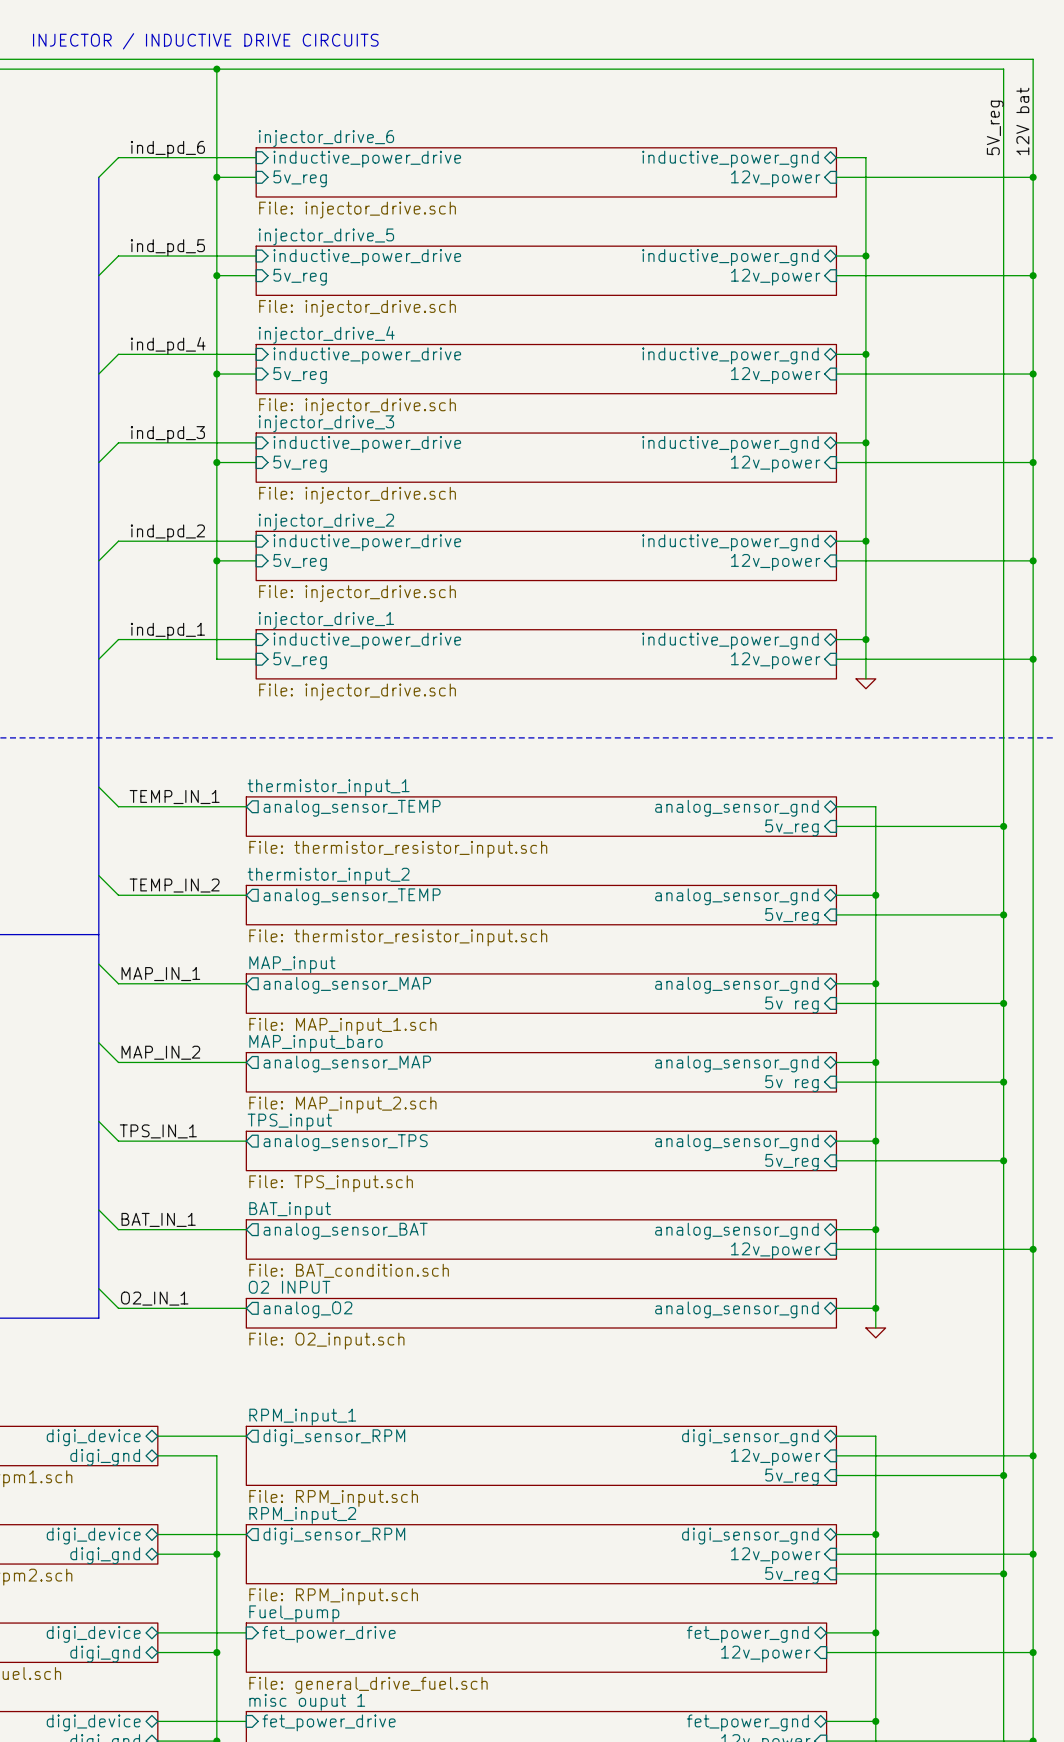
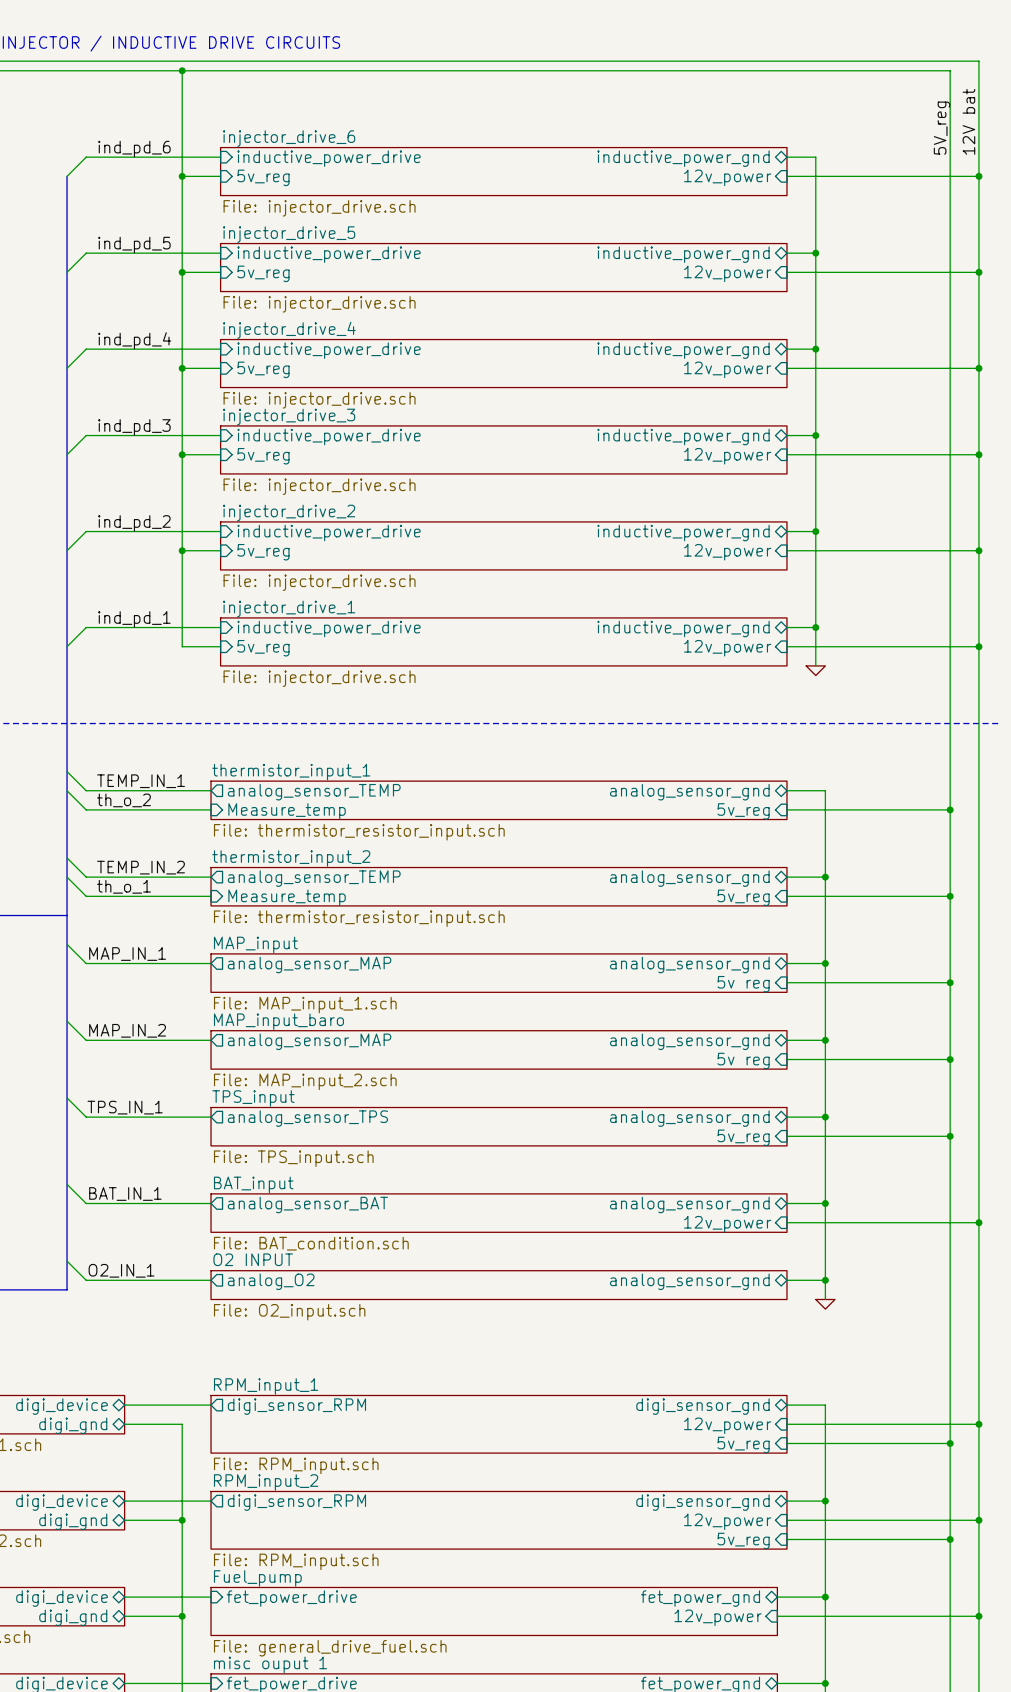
wire: none -> (67, 790) (86, 809) (211, 809)
label: none -> th_o_2 (124, 800)
sheet pin: none -> Measure_temp (287, 811)
wire: none -> (67, 877) (86, 896) (211, 896)
label: none -> th_o_1 (124, 886)
sheet pin: none -> Measure_temp (287, 897)

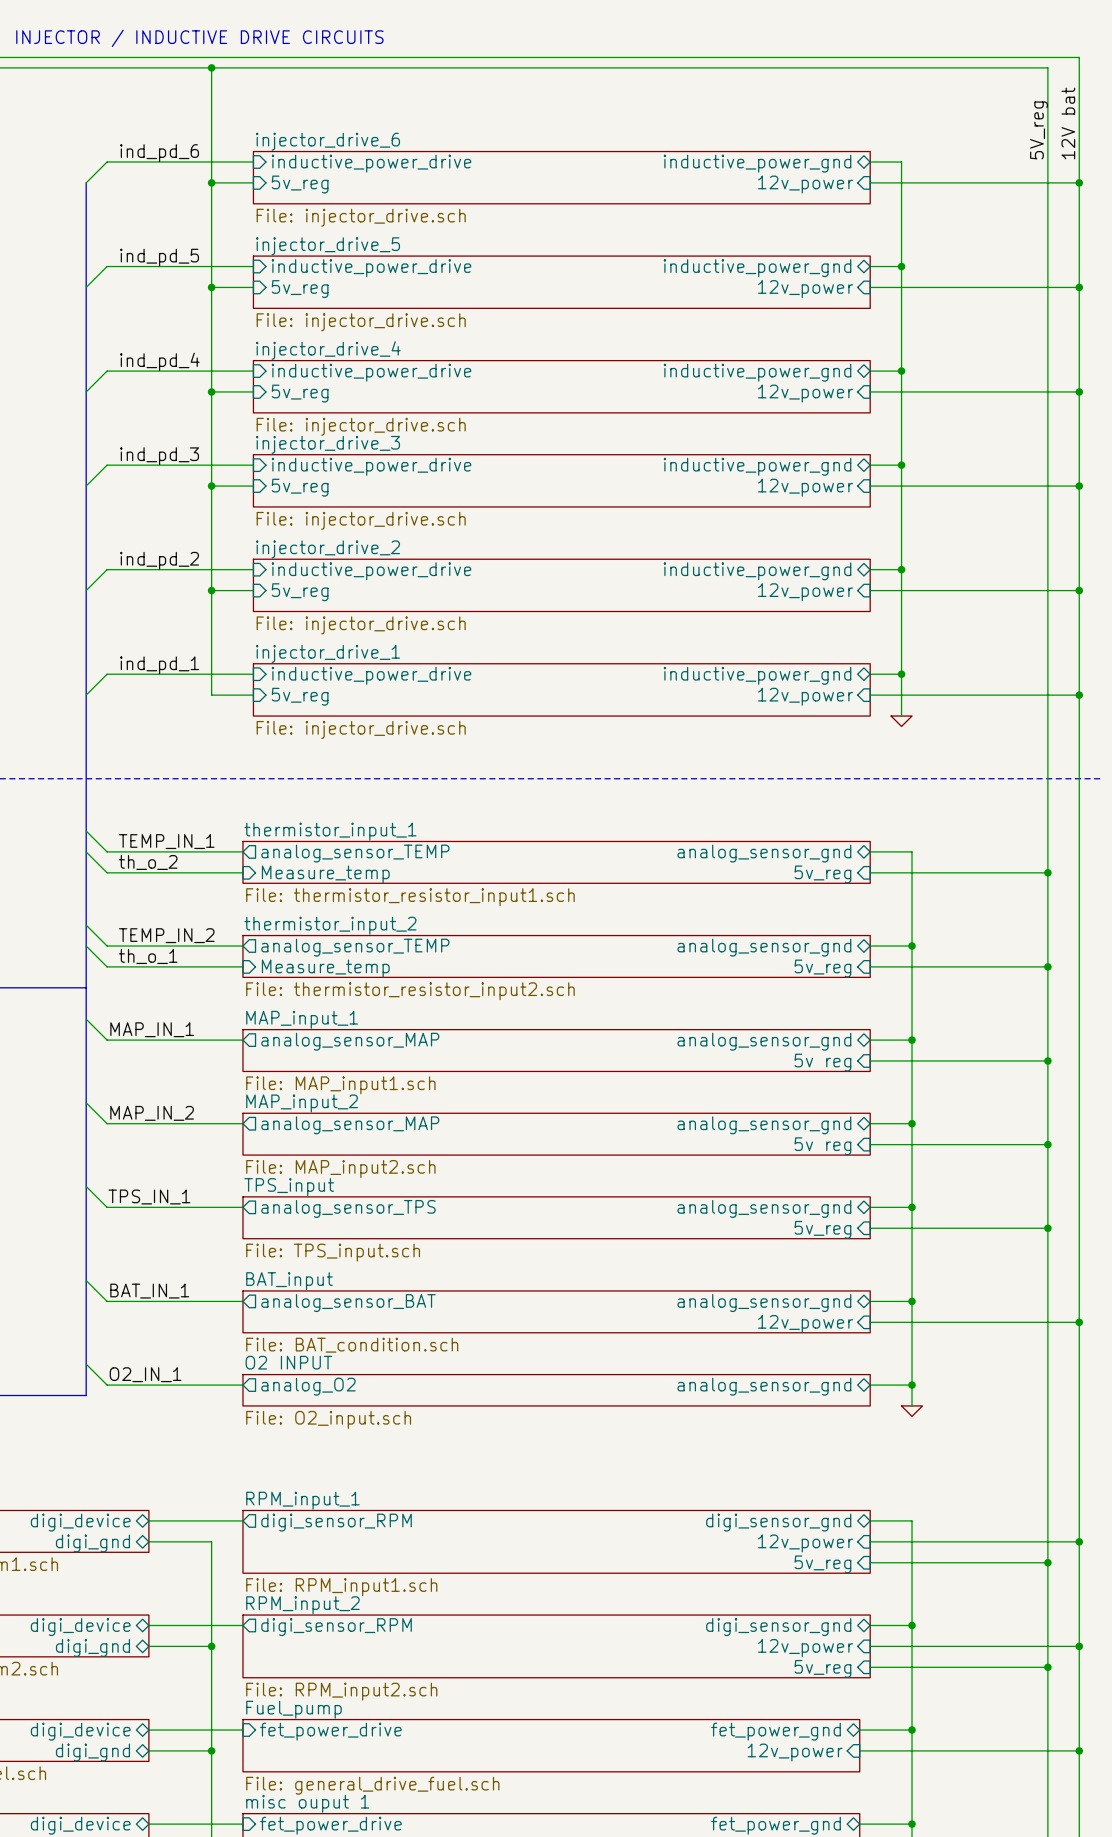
sheet thermistor_input_1 value: File: thermistor_resistor_input.sch (359, 832) -> File: thermistor_resistor_input1.sch (410, 897)
sheet thermistor_input_2 value: File: thermistor_resistor_input.sch (359, 918) -> File: thermistor_resistor_input2.sch (410, 991)
sheet MAP_input name: MAP_input (255, 944) -> MAP_input_1 (302, 1019)
sheet MAP_input value: File: MAP_input_1.sch (305, 1005) -> File: MAP_input1.sch (340, 1085)
sheet MAP_input_baro name: MAP_input_baro (278, 1021) -> MAP_input_2 (302, 1103)
sheet MAP_input_baro value: File: MAP_input_2.sch (305, 1081) -> File: MAP_input2.sch (340, 1168)
sheet RPM_input_1 value: File: RPM_input.sch (296, 1465) -> File: RPM_input1.sch (341, 1587)
sheet RPM_input_2 value: File: RPM_input.sch (296, 1561) -> File: RPM_input2.sch (341, 1691)

